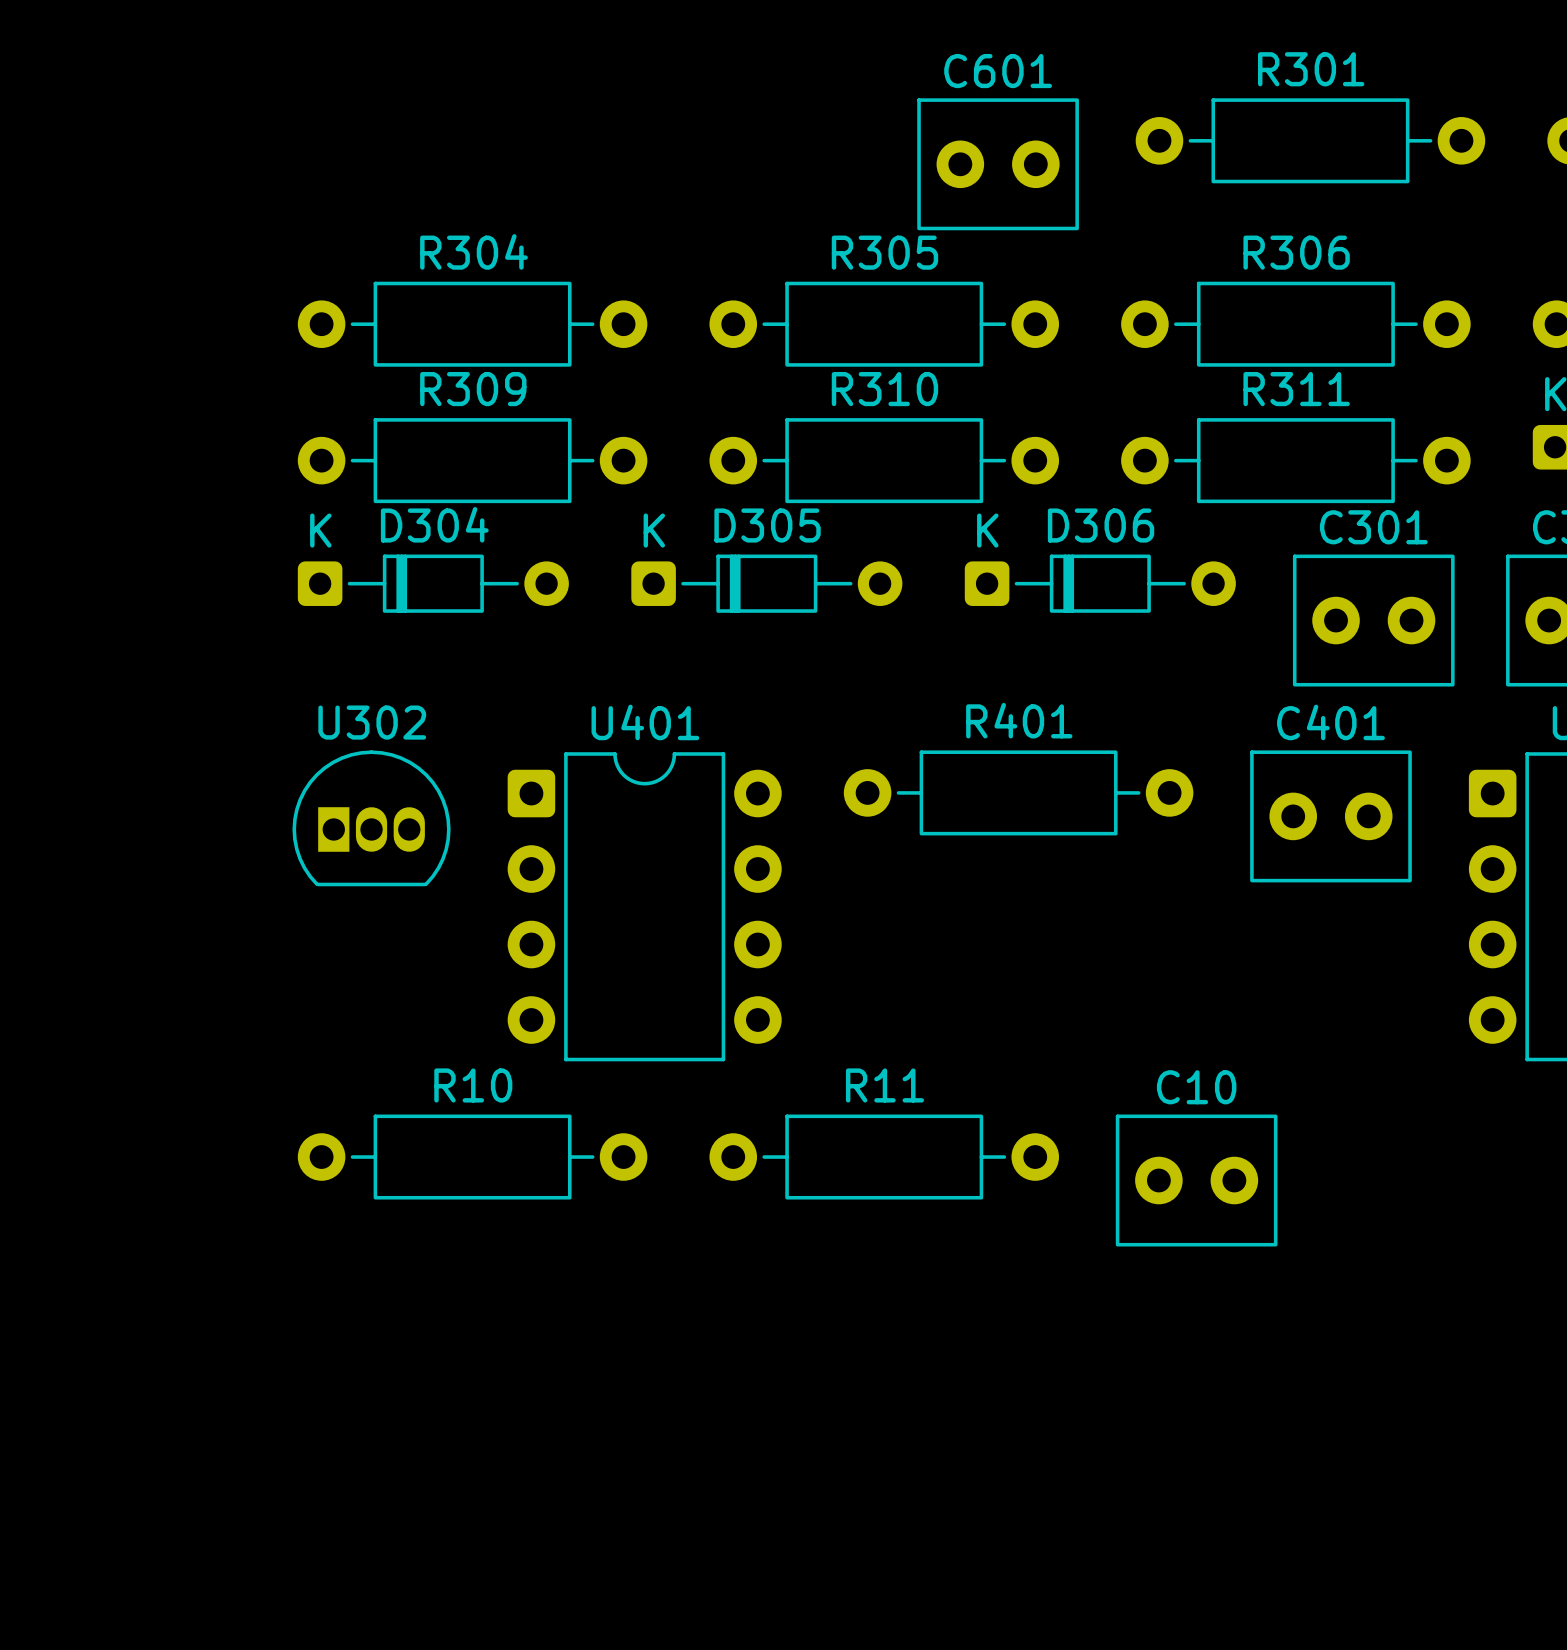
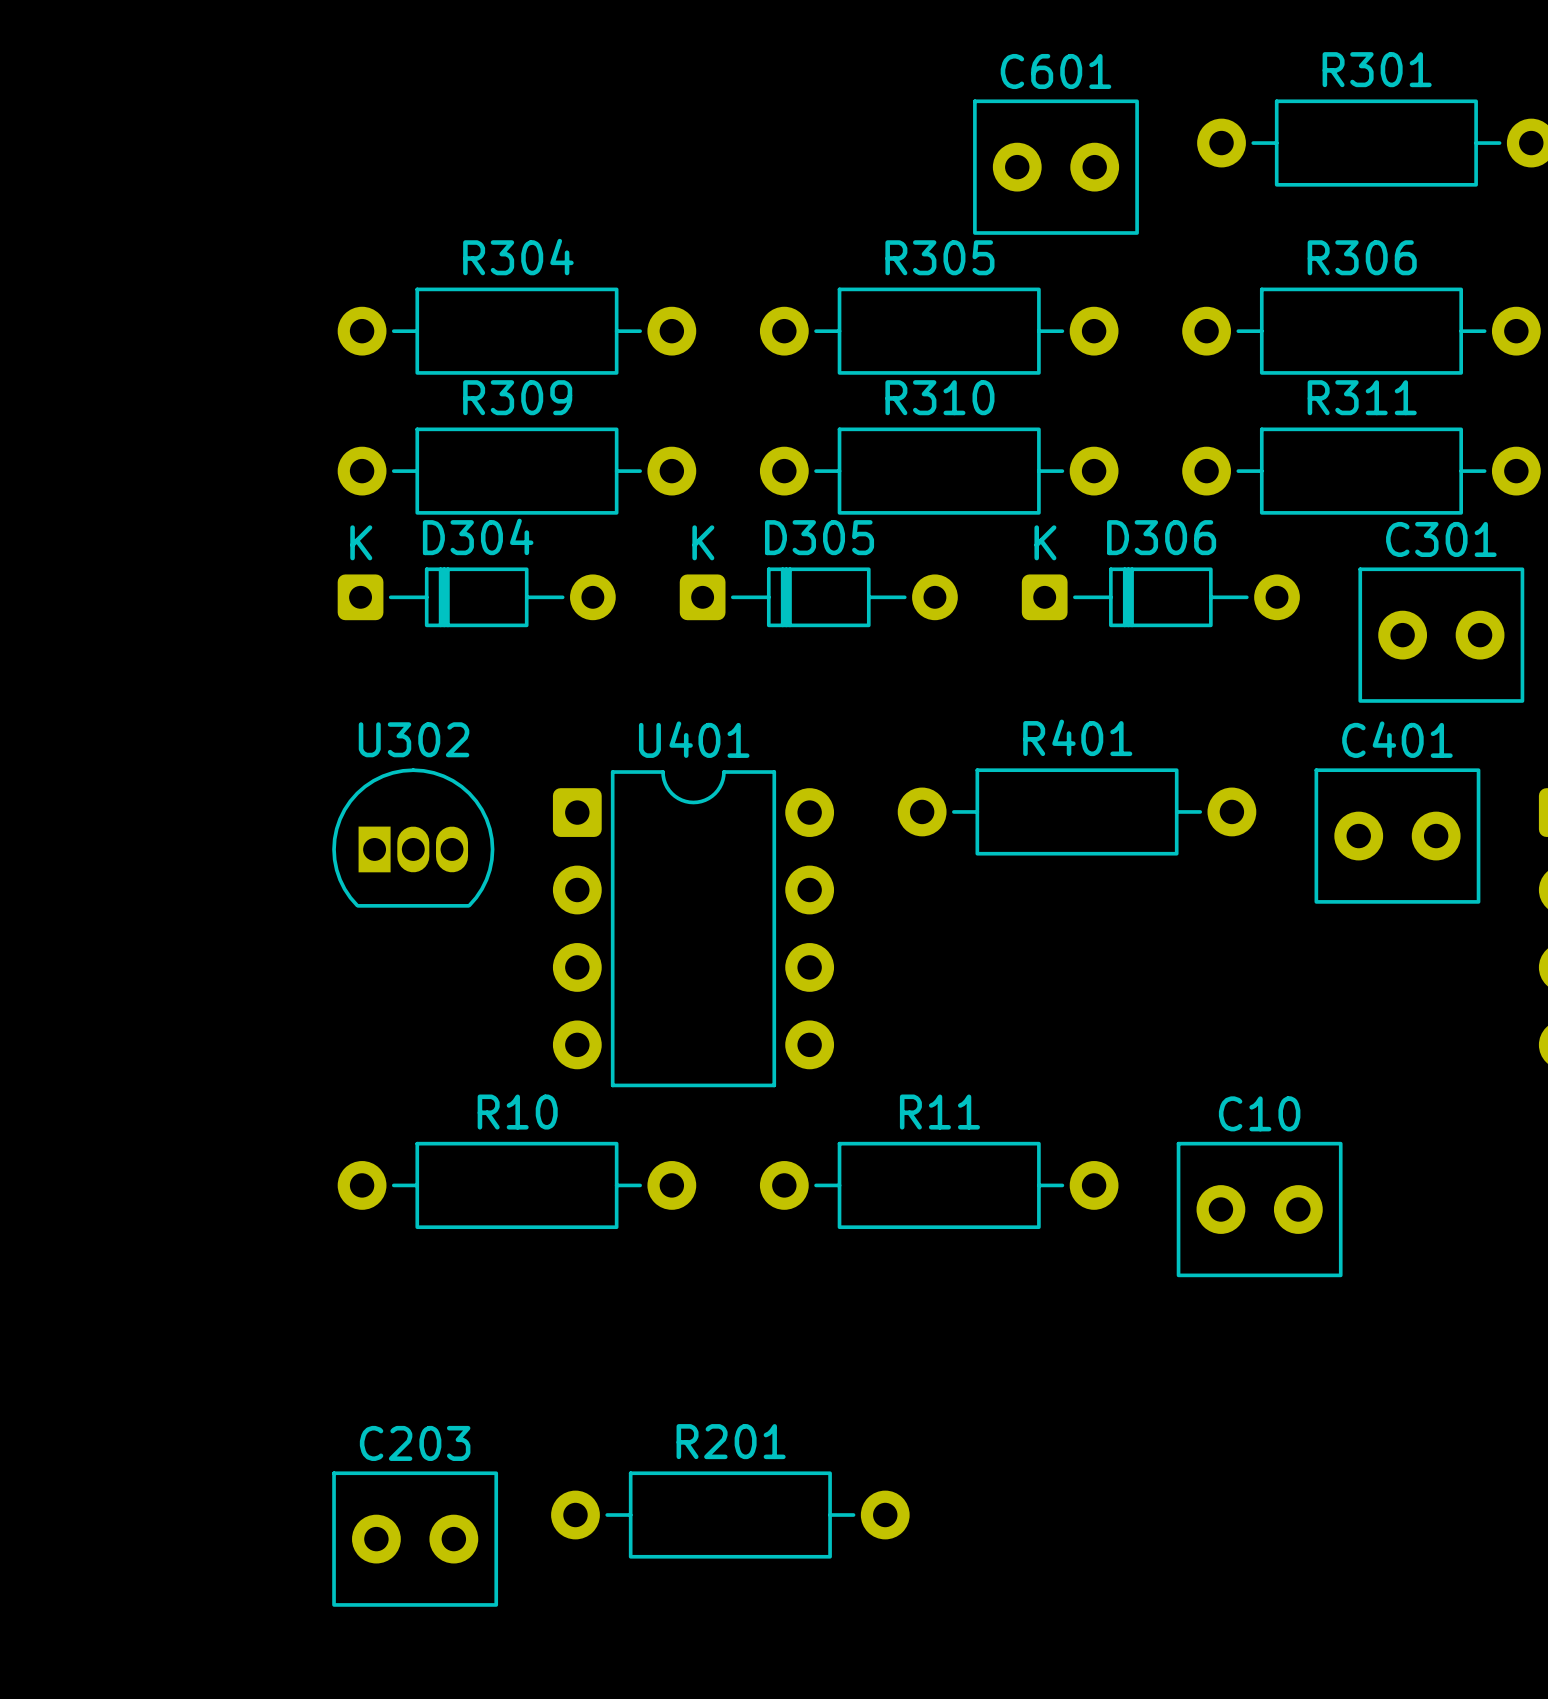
R201: none -> (730, 1515)
C203: none -> (415, 1539)

